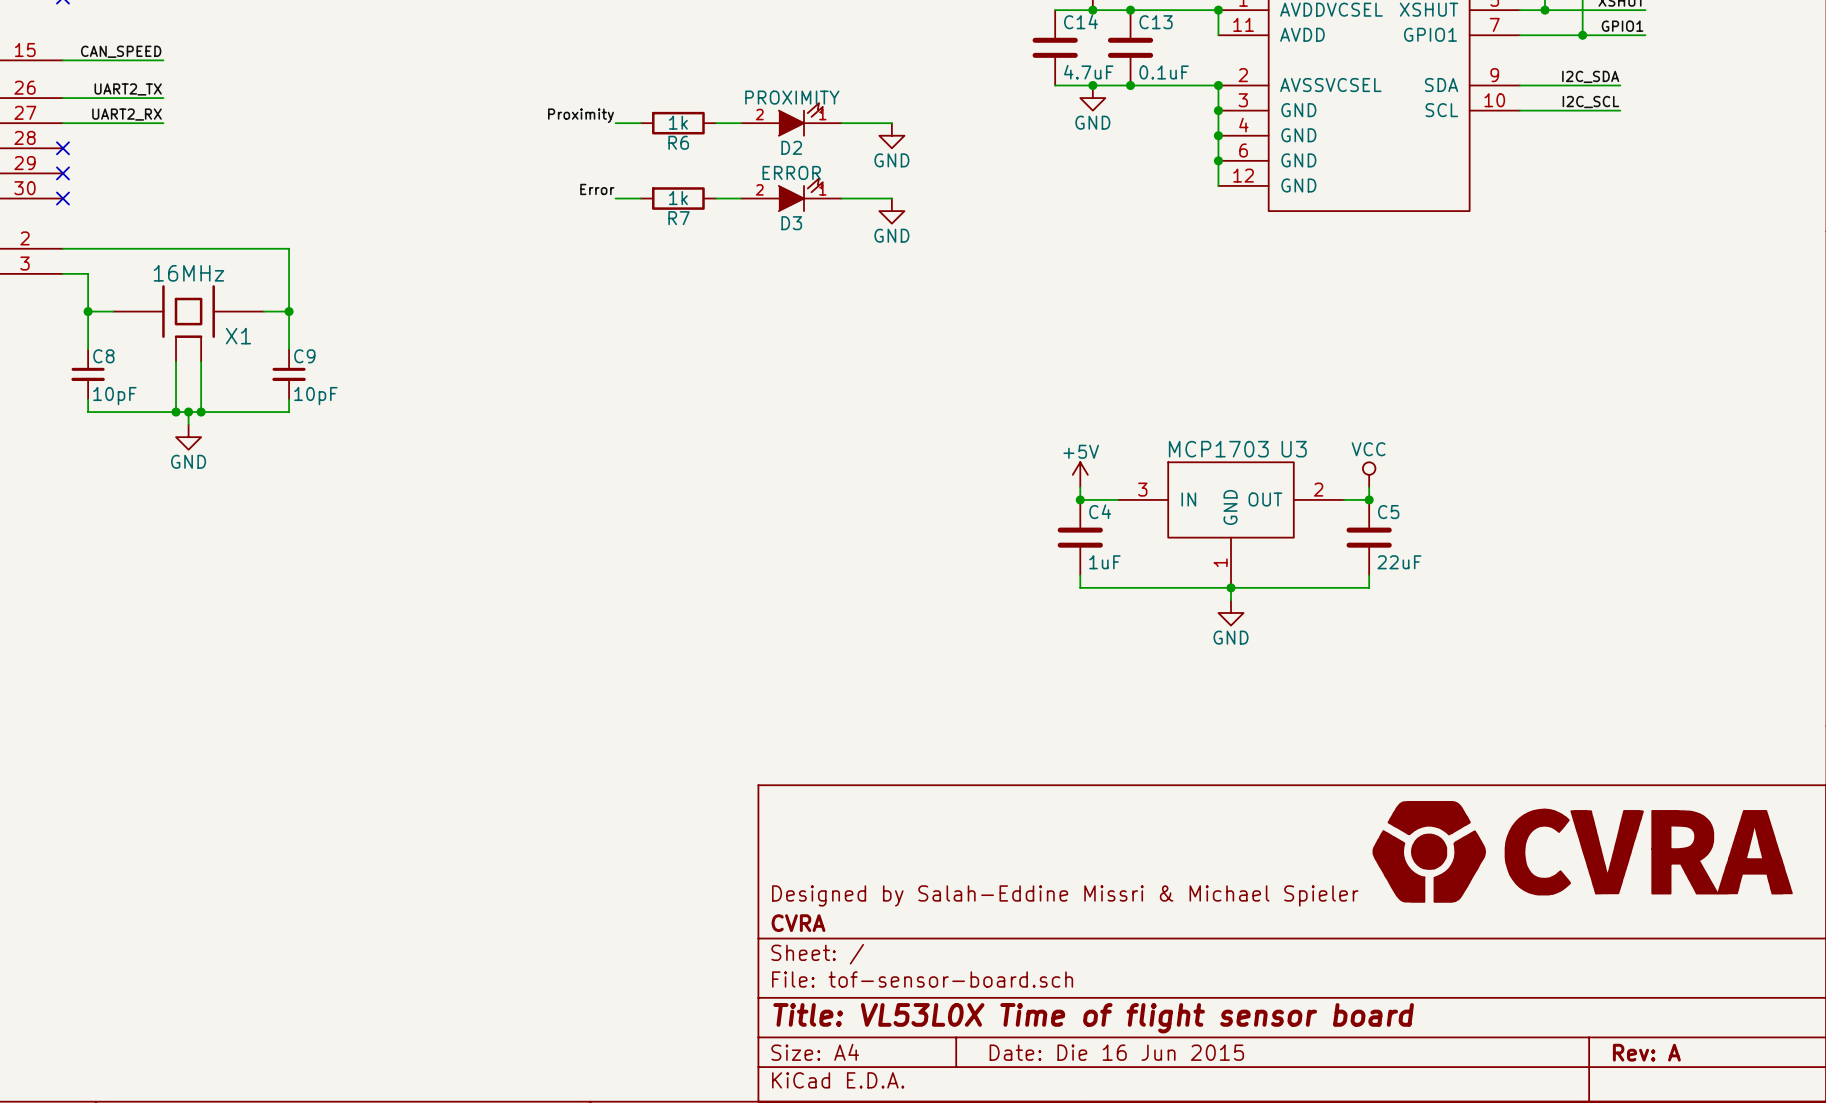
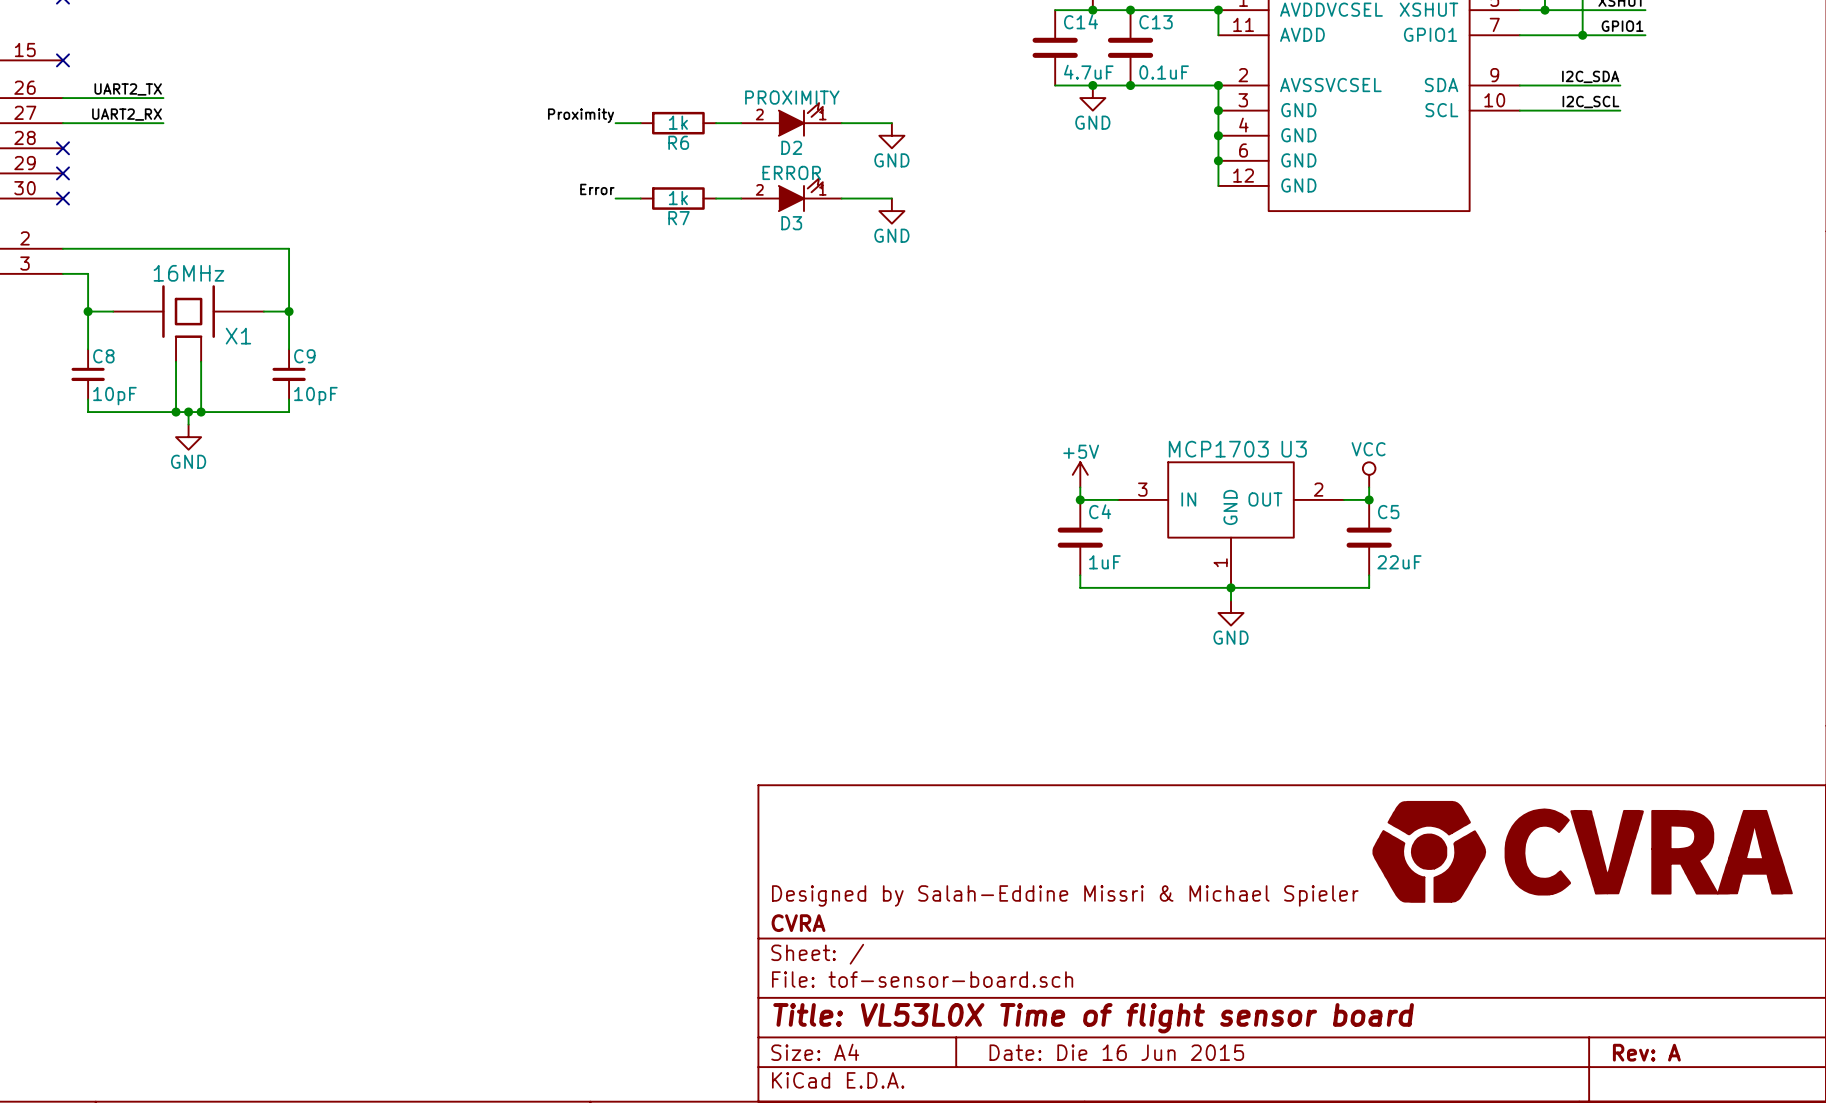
label: CAN_SPEED (121, 51) -> none
wire: (62, 60) (163, 60) -> none
no-connect mark: none -> (62, 60)

